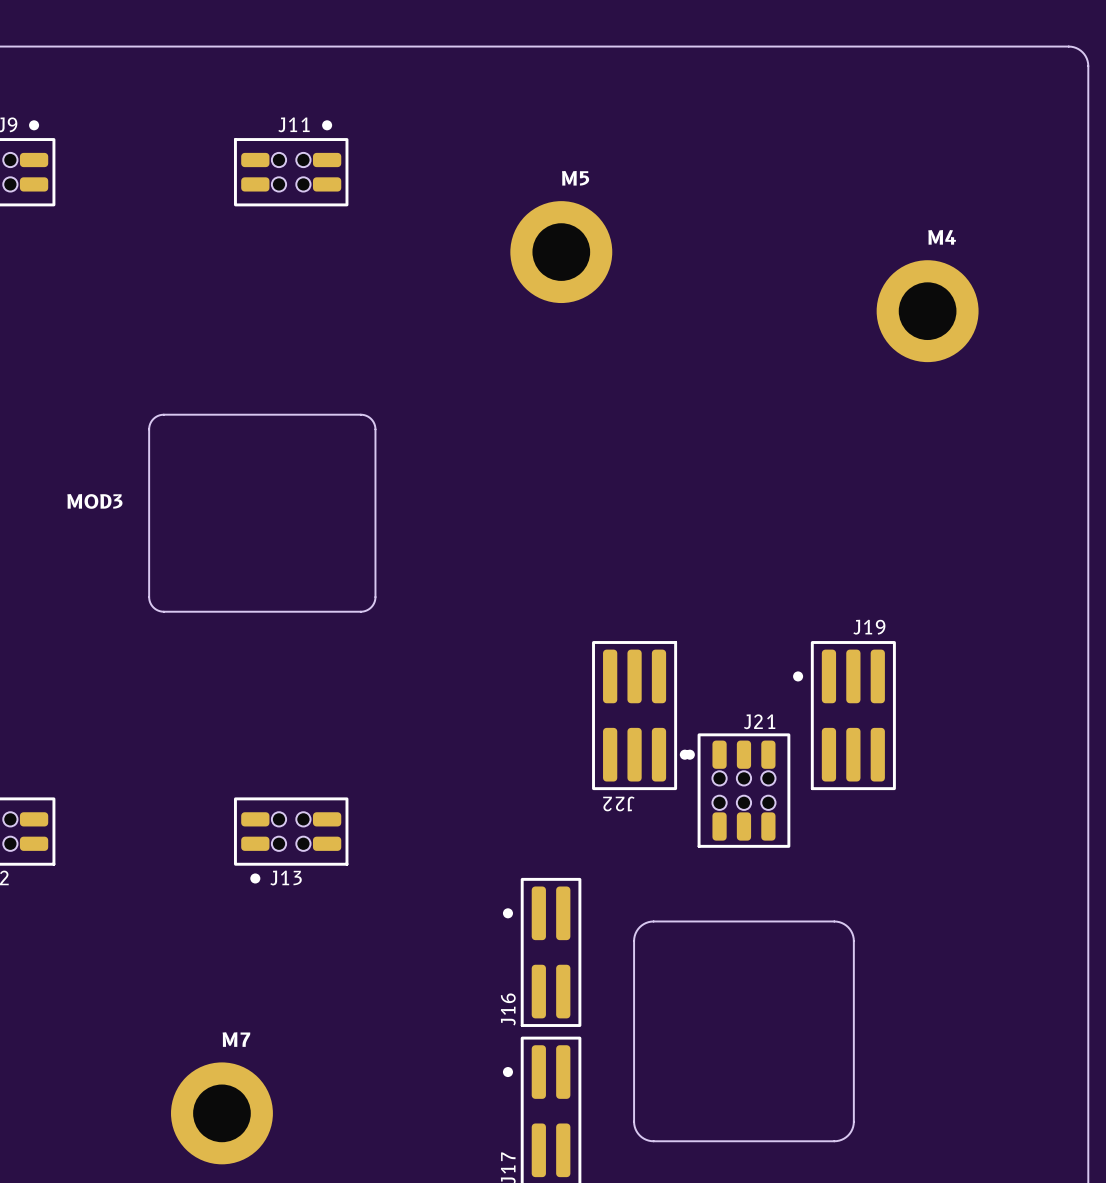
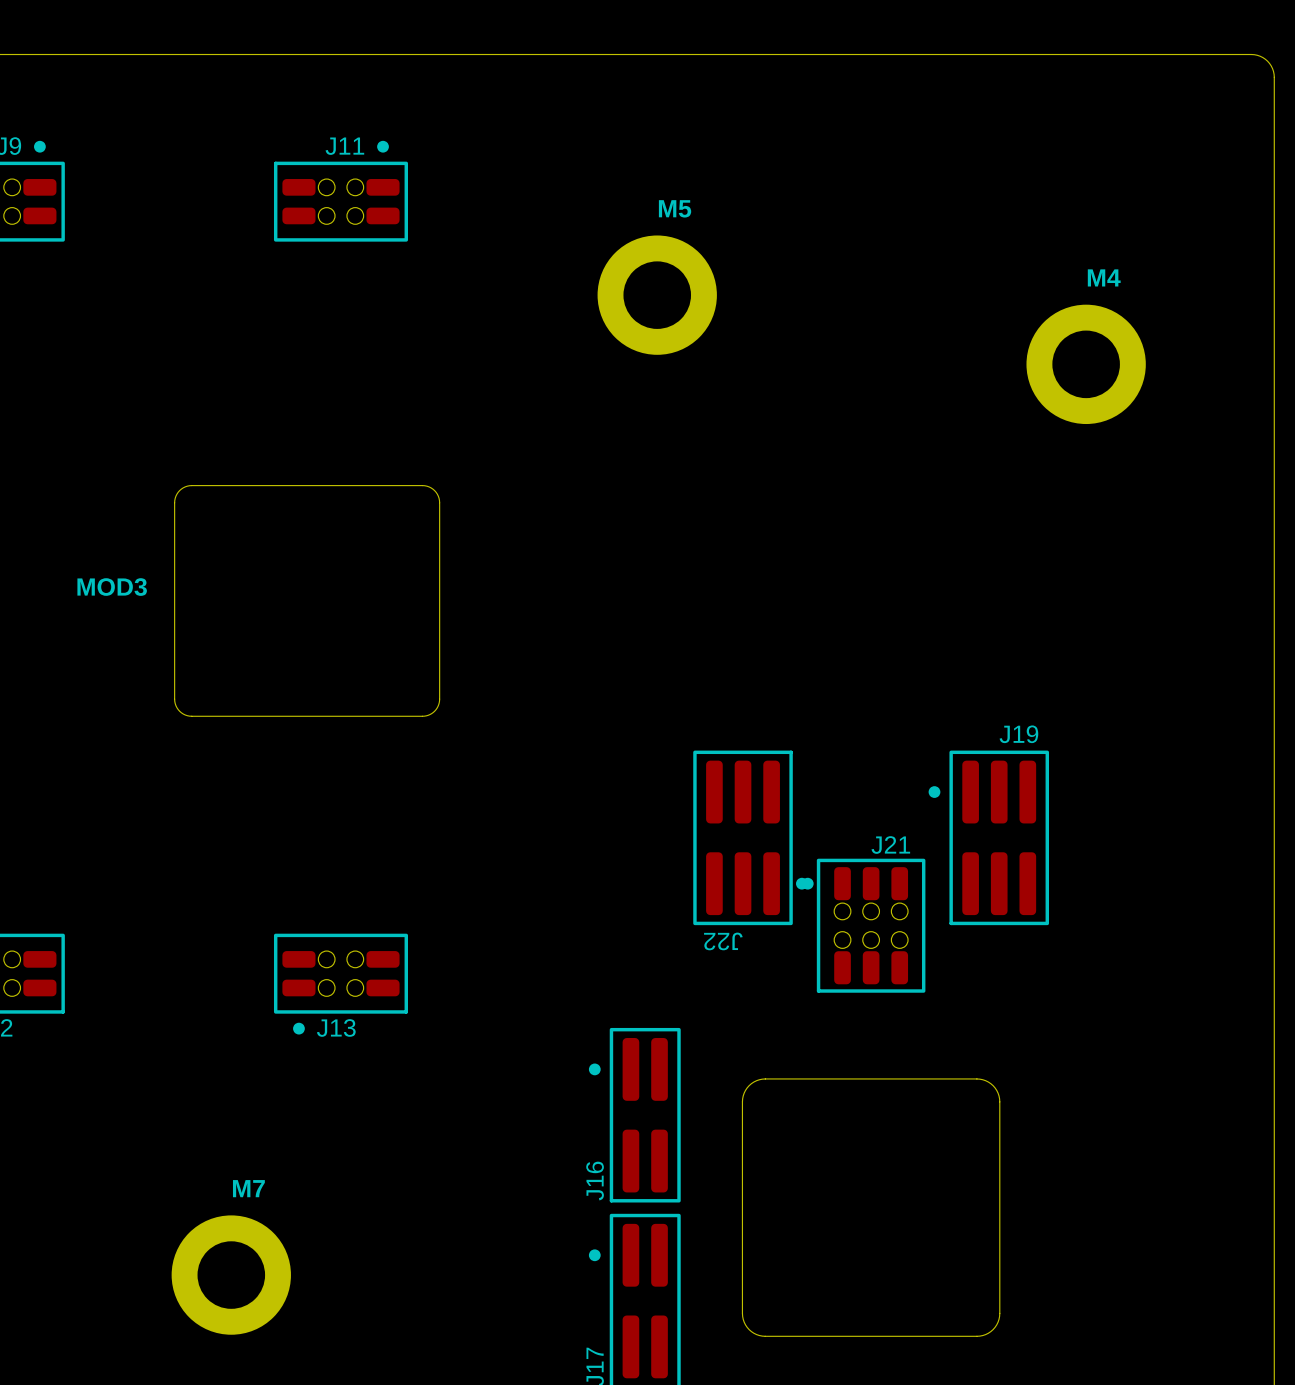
M7 position: (221, 1113) -> (231, 1275)

